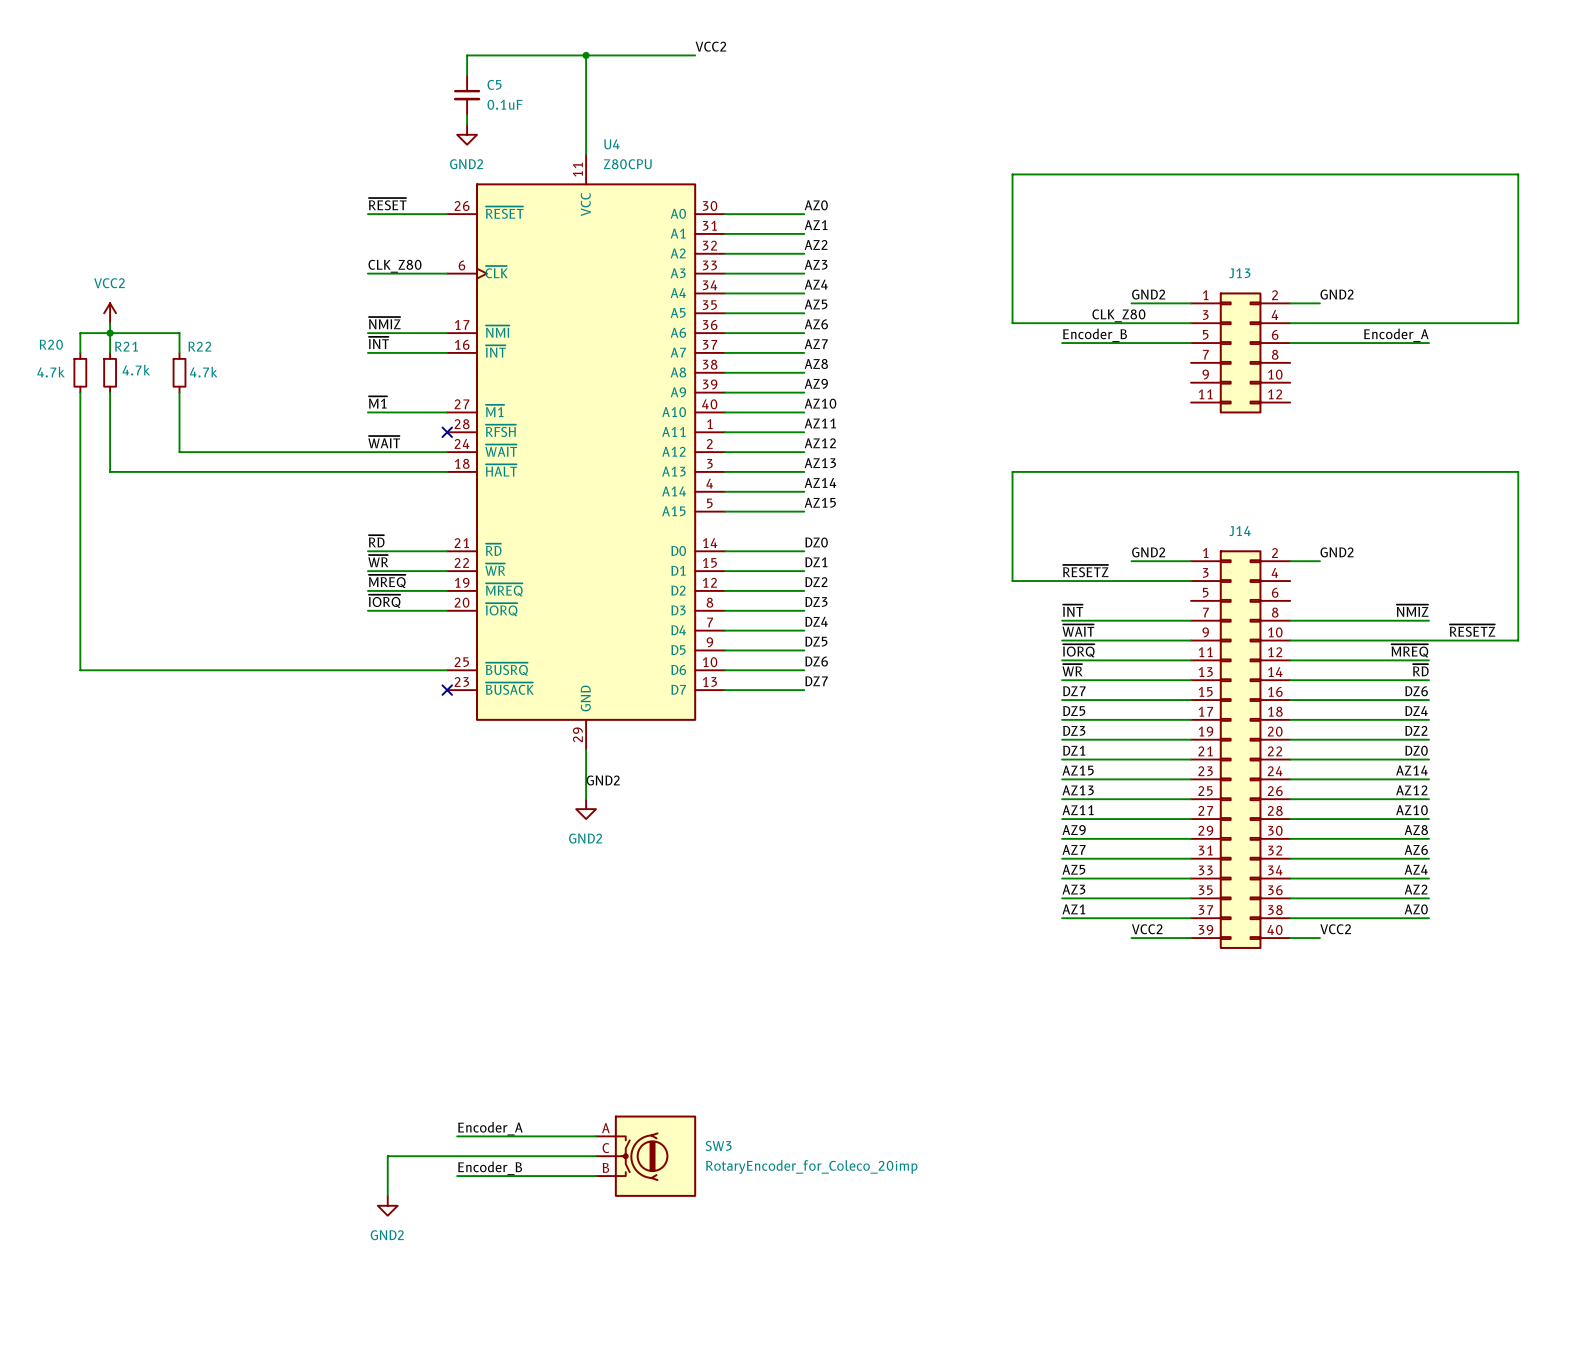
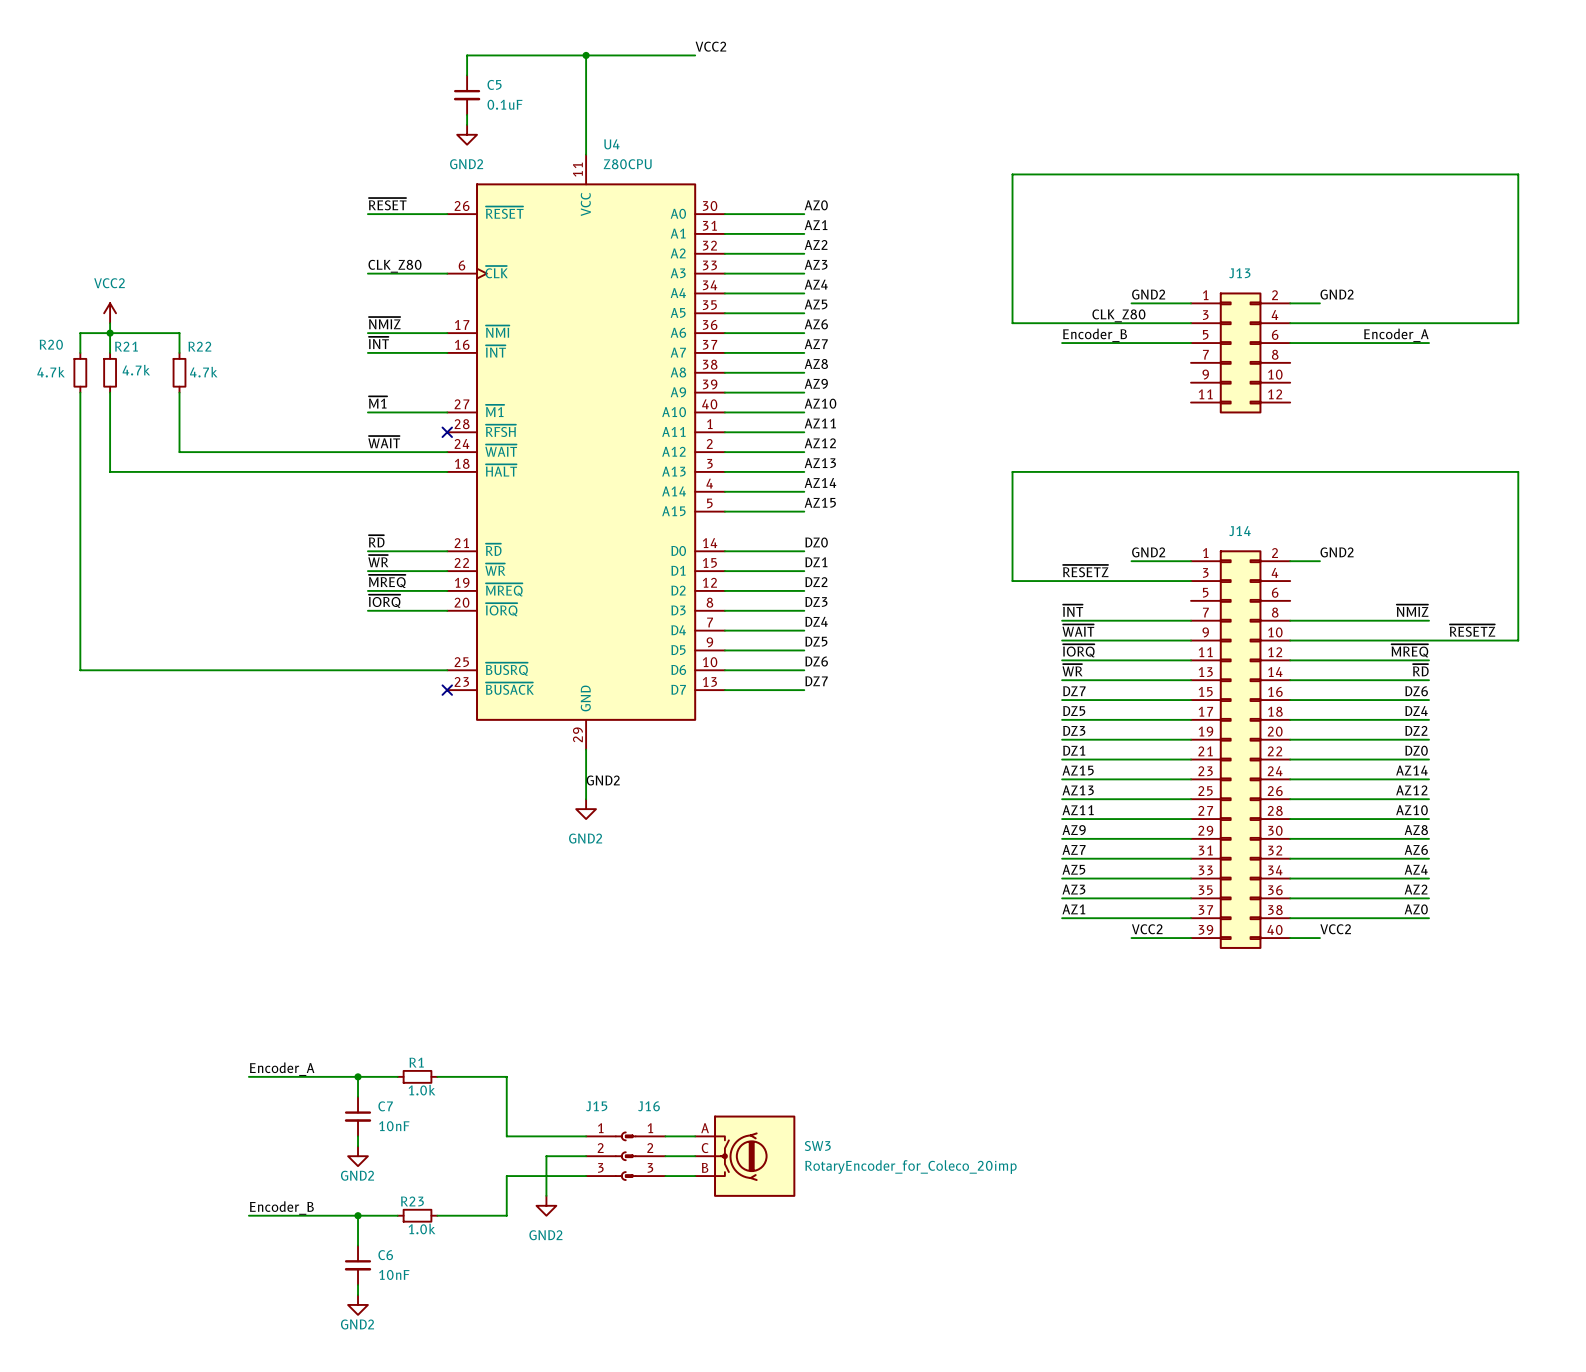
label: none -> Encoder_A (282, 1069)
wire: none -> (248, 1076) (397, 1076)
wire: none -> (358, 1076) (358, 1096)
junction: none -> (358, 1076)
R1: none -> 1.0k (417, 1076)
C7: none -> 10nF (358, 1116)
label: Encoder_A (490, 1128) -> none
wire: none -> (358, 1136) (358, 1146)
wire: (457, 1136) (506, 1136) -> (437, 1076) (506, 1076) (506, 1136)
power symbol: none -> GND2 (358, 1156)
wire: (546, 1156) (387, 1156) (387, 1195) -> (546, 1156) (546, 1195)
J15: none -> (606, 1156)
J16: none -> (645, 1156)
SW3 position: (646, 1156) -> (745, 1156)
label: Encoder_B (490, 1168) -> none
wire: (457, 1176) (506, 1176) -> (437, 1215) (506, 1215) (506, 1176)
power symbol: GND2 (387, 1205) -> none
power symbol: none -> GND2 (546, 1205)
label: none -> Encoder_B (281, 1208)
wire: none -> (248, 1215) (397, 1215)
wire: none -> (358, 1215) (358, 1245)
junction: none -> (358, 1215)
R23: none -> 1.0k (417, 1215)
C6: none -> 10nF (358, 1265)
wire: none -> (358, 1285) (358, 1295)
power symbol: none -> GND2 (358, 1304)

